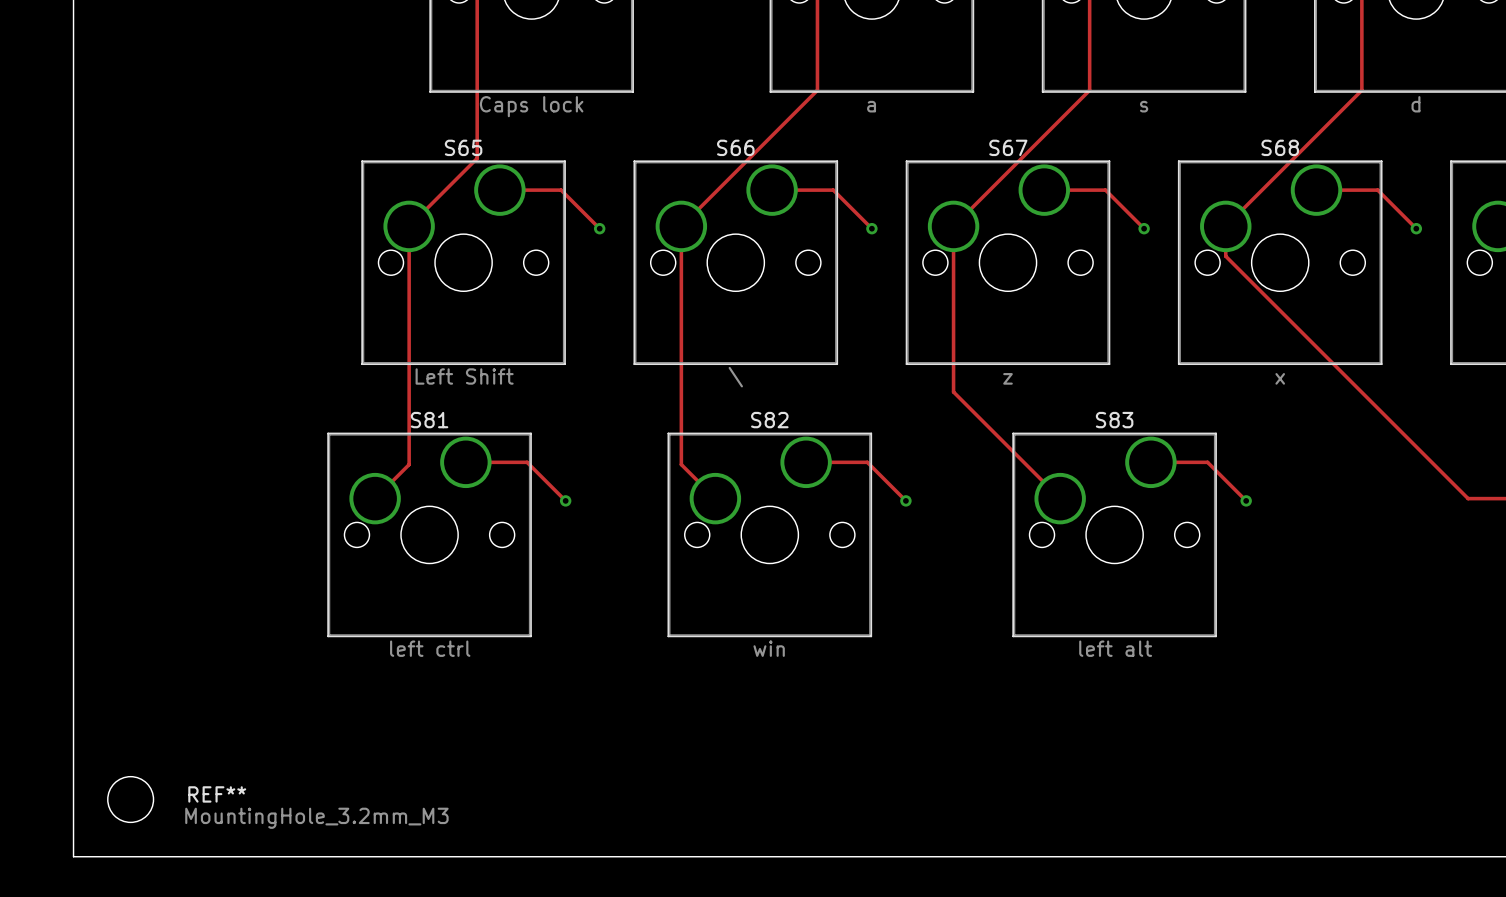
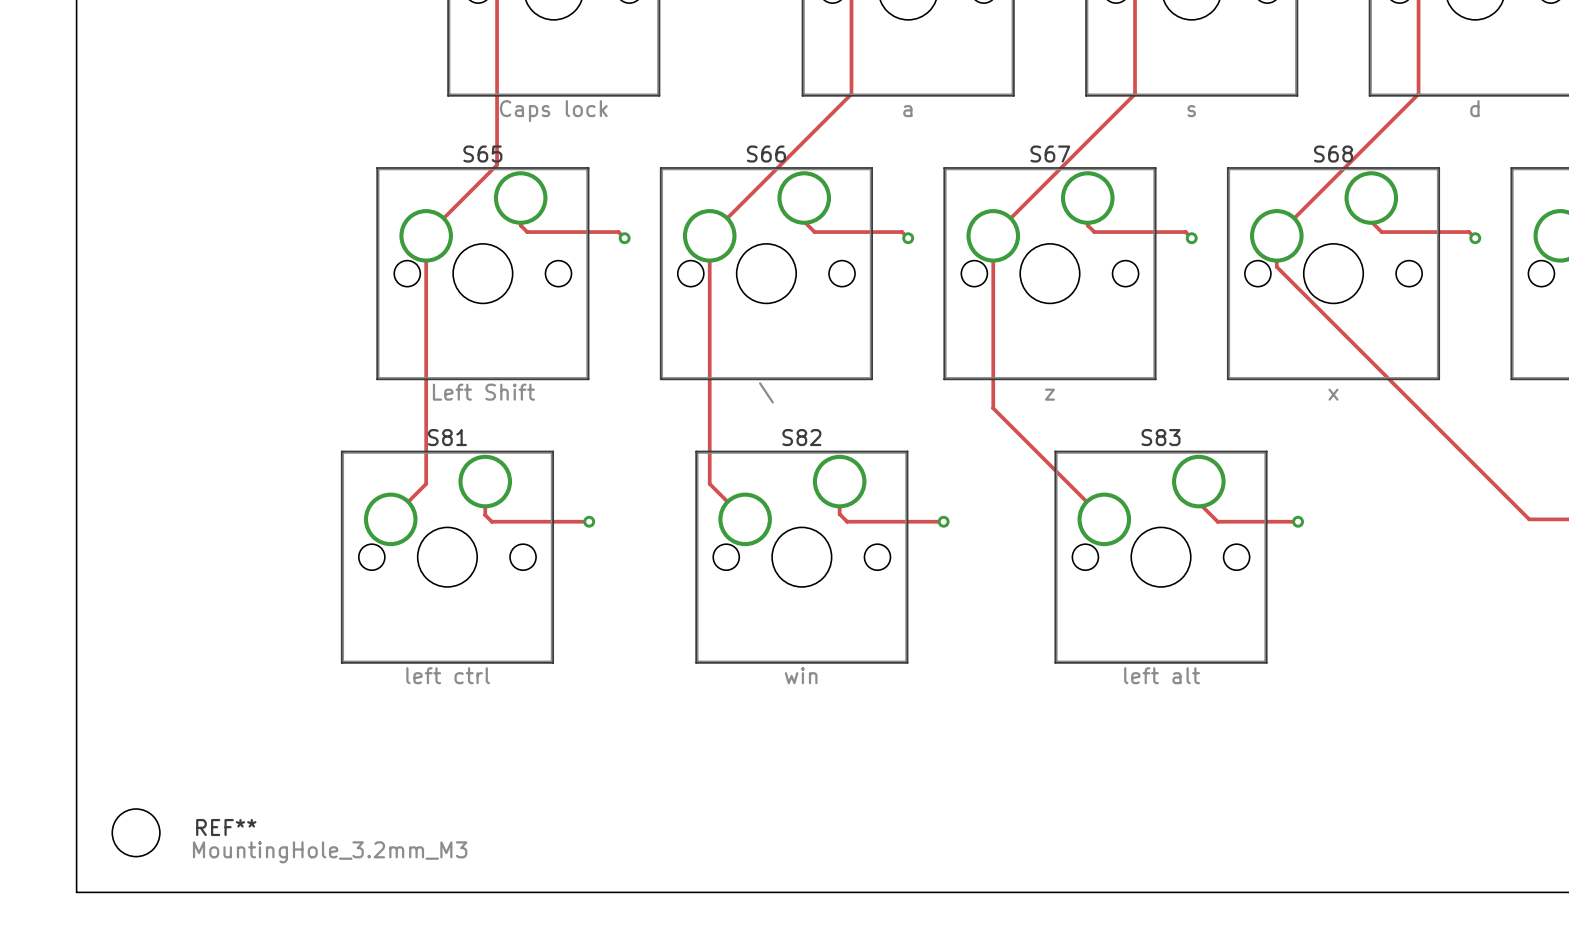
track: (499, 190) (561, 190) (593, 222) -> (520, 198) (520, 225) (527, 232) (618, 232)
track: (772, 190) (833, 190) (866, 222) -> (804, 198) (804, 221) (814, 232) (902, 232)
track: (1044, 190) (1105, 190) (1138, 222) -> (1087, 198) (1087, 225) (1094, 232) (1185, 232)
track: (1316, 190) (1377, 190) (1410, 222) -> (1371, 198) (1371, 221) (1381, 232) (1469, 232)
track: (465, 462) (527, 462) (565, 500) -> (485, 481) (485, 515) (491, 521) (589, 521)
track: (806, 462) (867, 462) (905, 500) -> (839, 481) (839, 514) (847, 521) (943, 521)
track: (1150, 462) (1207, 462) (1246, 500) -> (1198, 481) (1198, 502) (1217, 521) (1298, 521)

